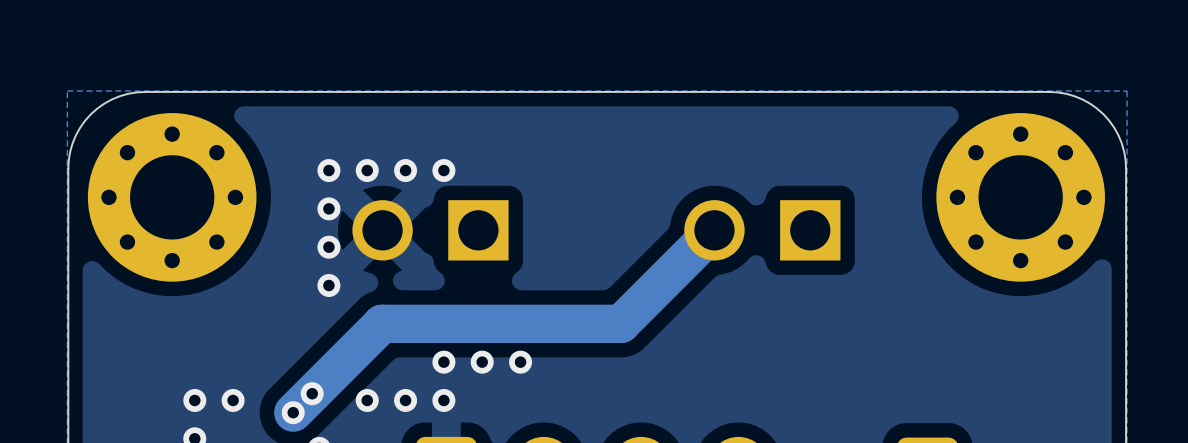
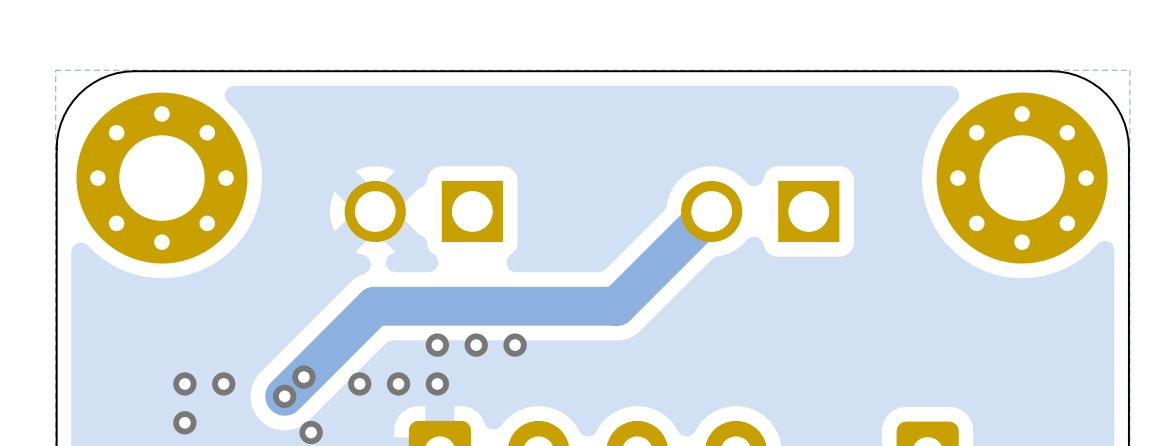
via: (328, 170) -> none
via: (367, 170) -> none
via: (405, 170) -> none
via: (443, 170) -> none
via: (328, 208) -> none
via: (328, 247) -> none
via: (328, 285) -> none

